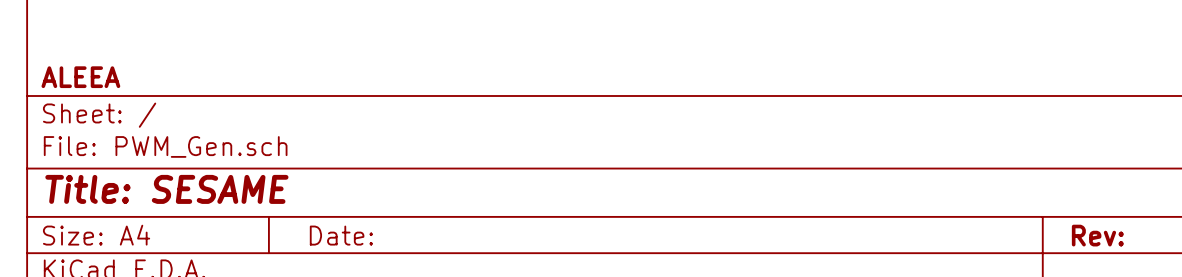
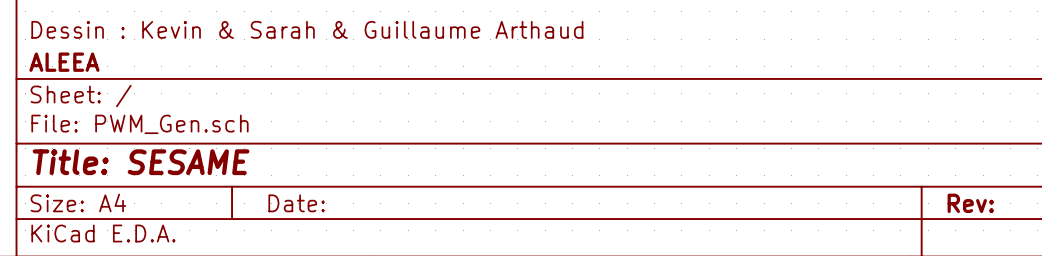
title block: none -> Dessin : Kevin & Sarah & Guillaume Arthaud (307, 29)

